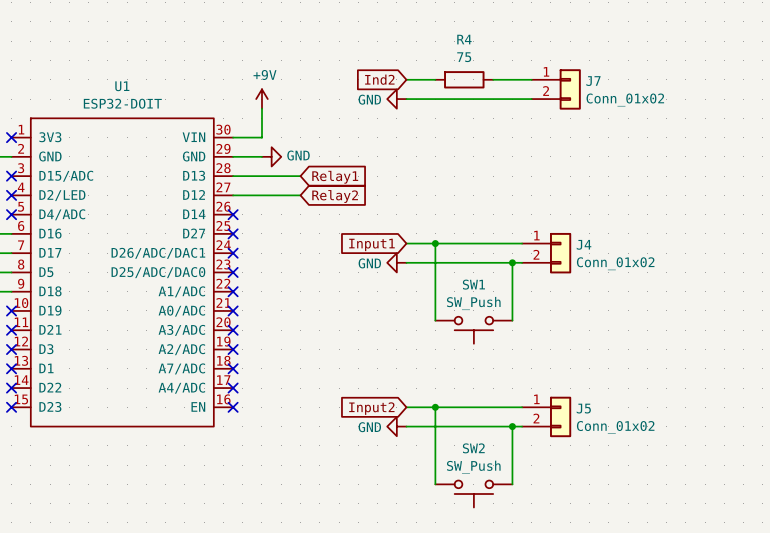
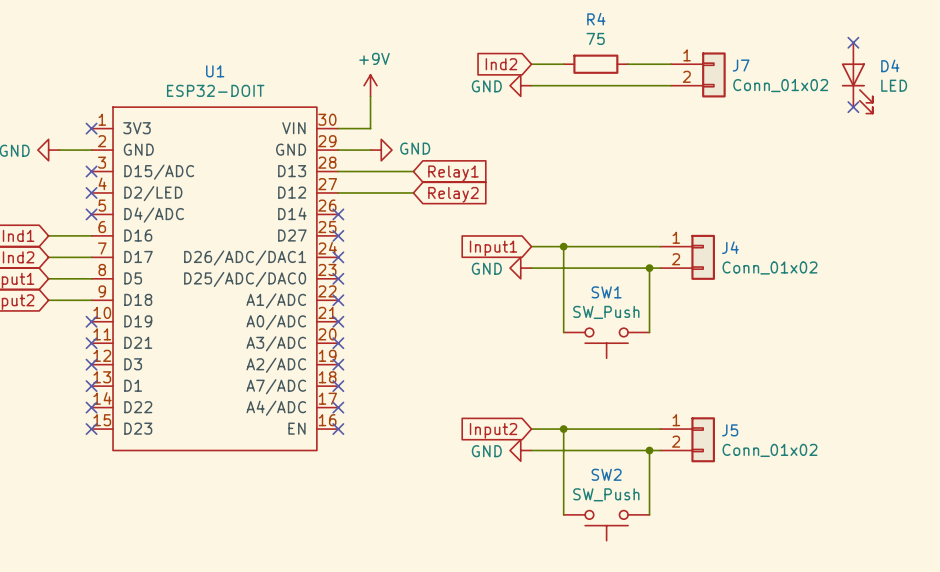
no-connect mark: none -> (853, 42)
D4: none -> LED (857, 78)
no-connect mark: none -> (853, 107)

